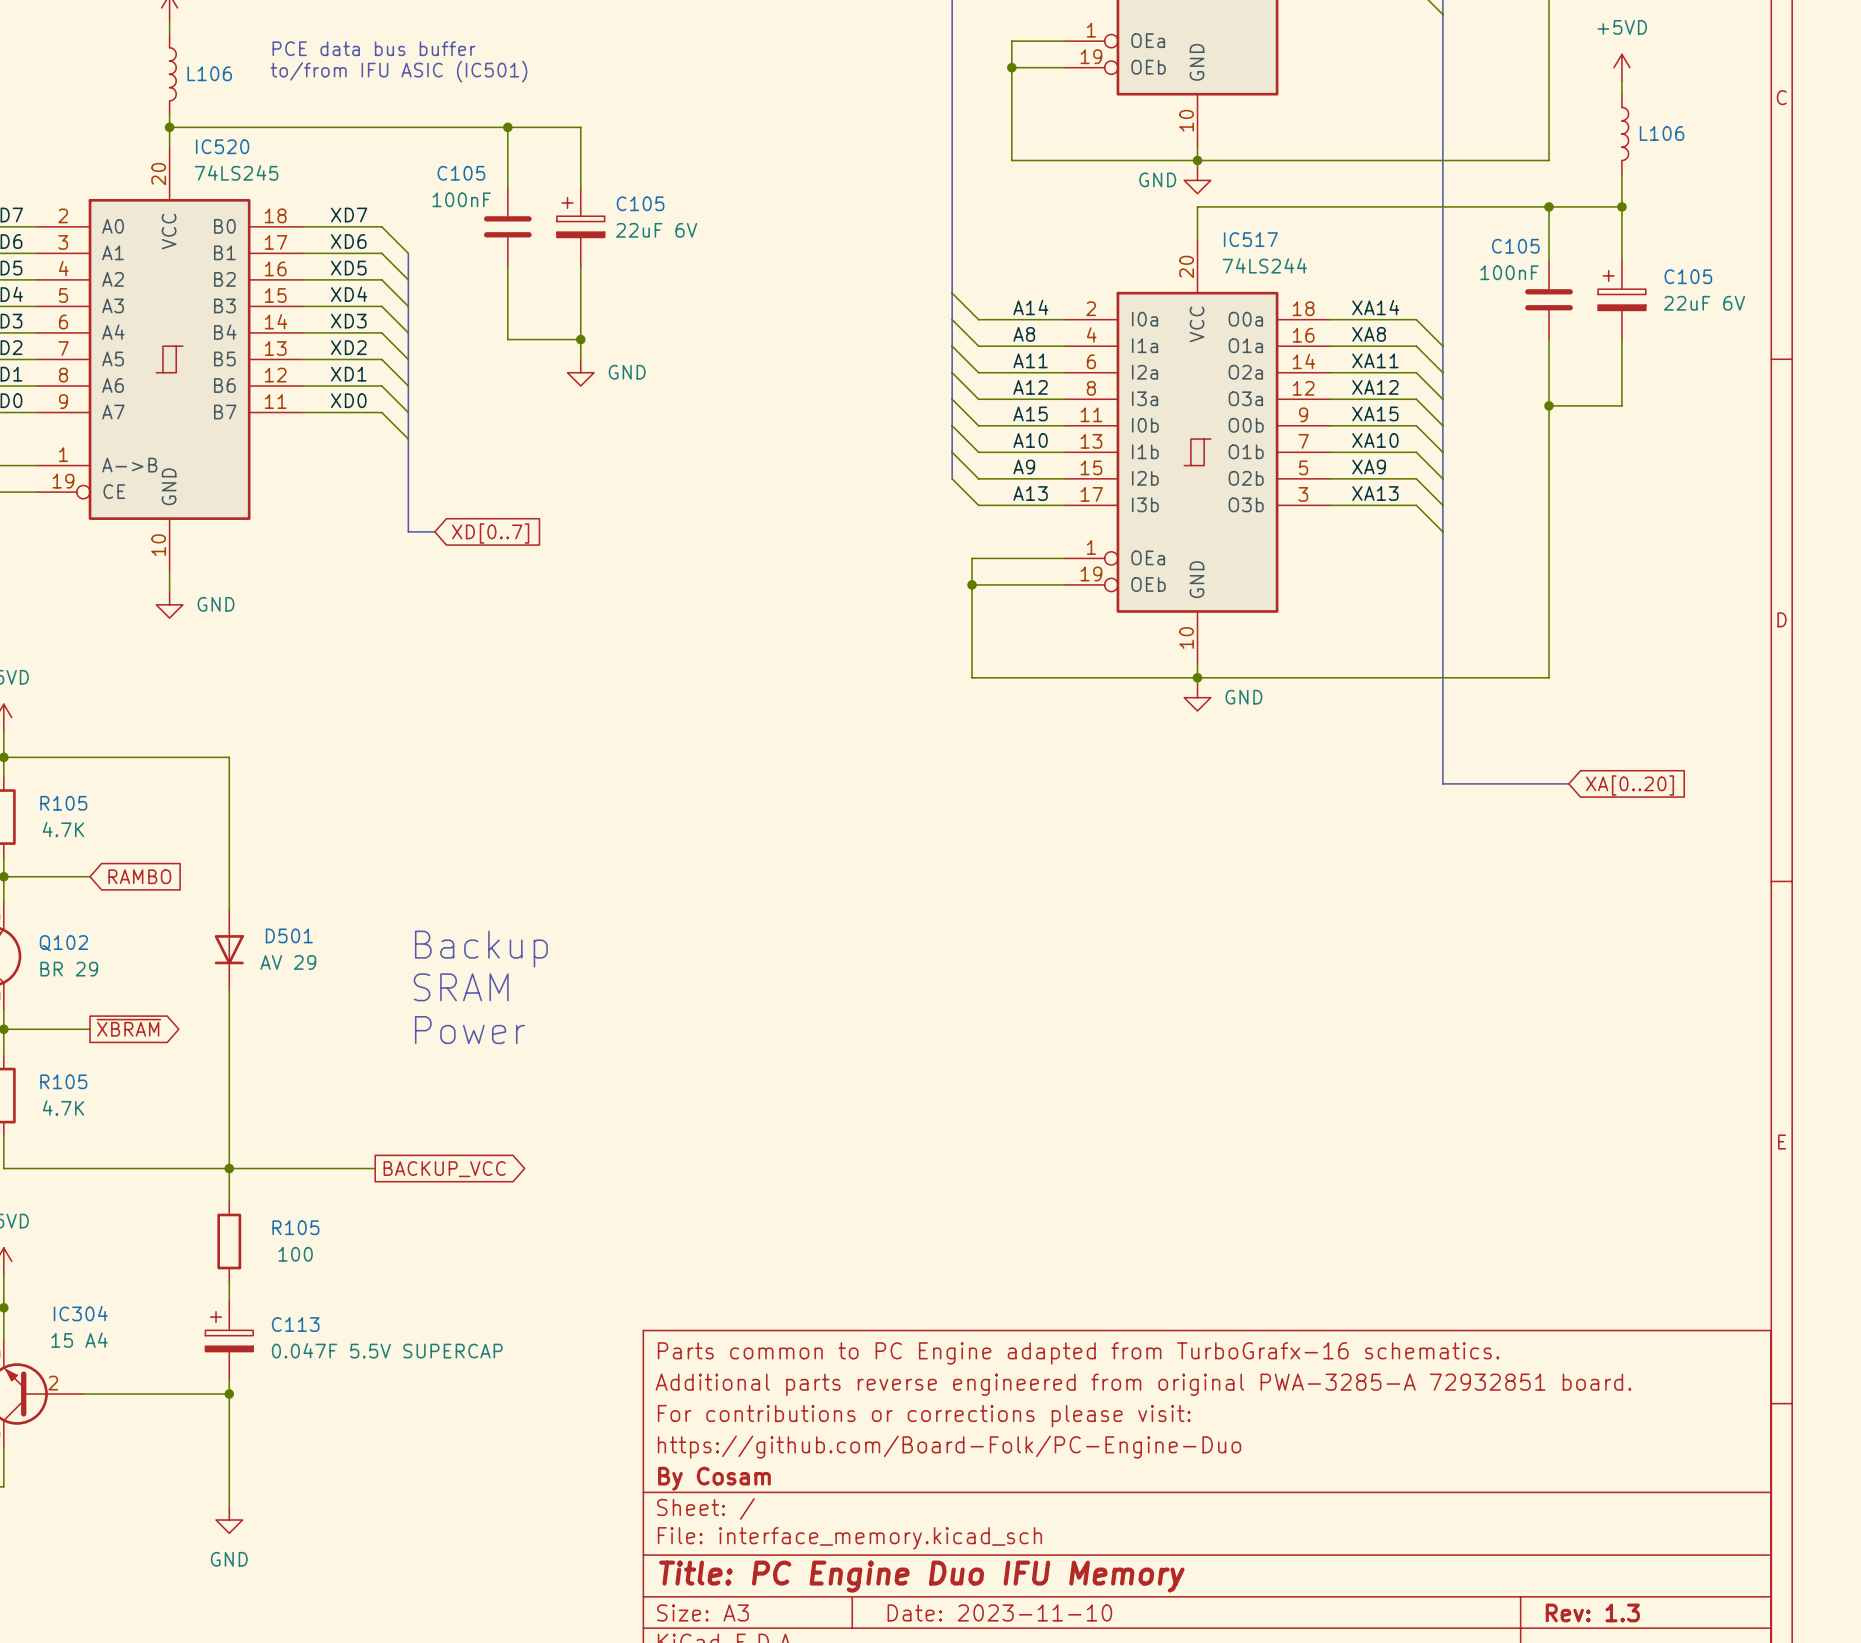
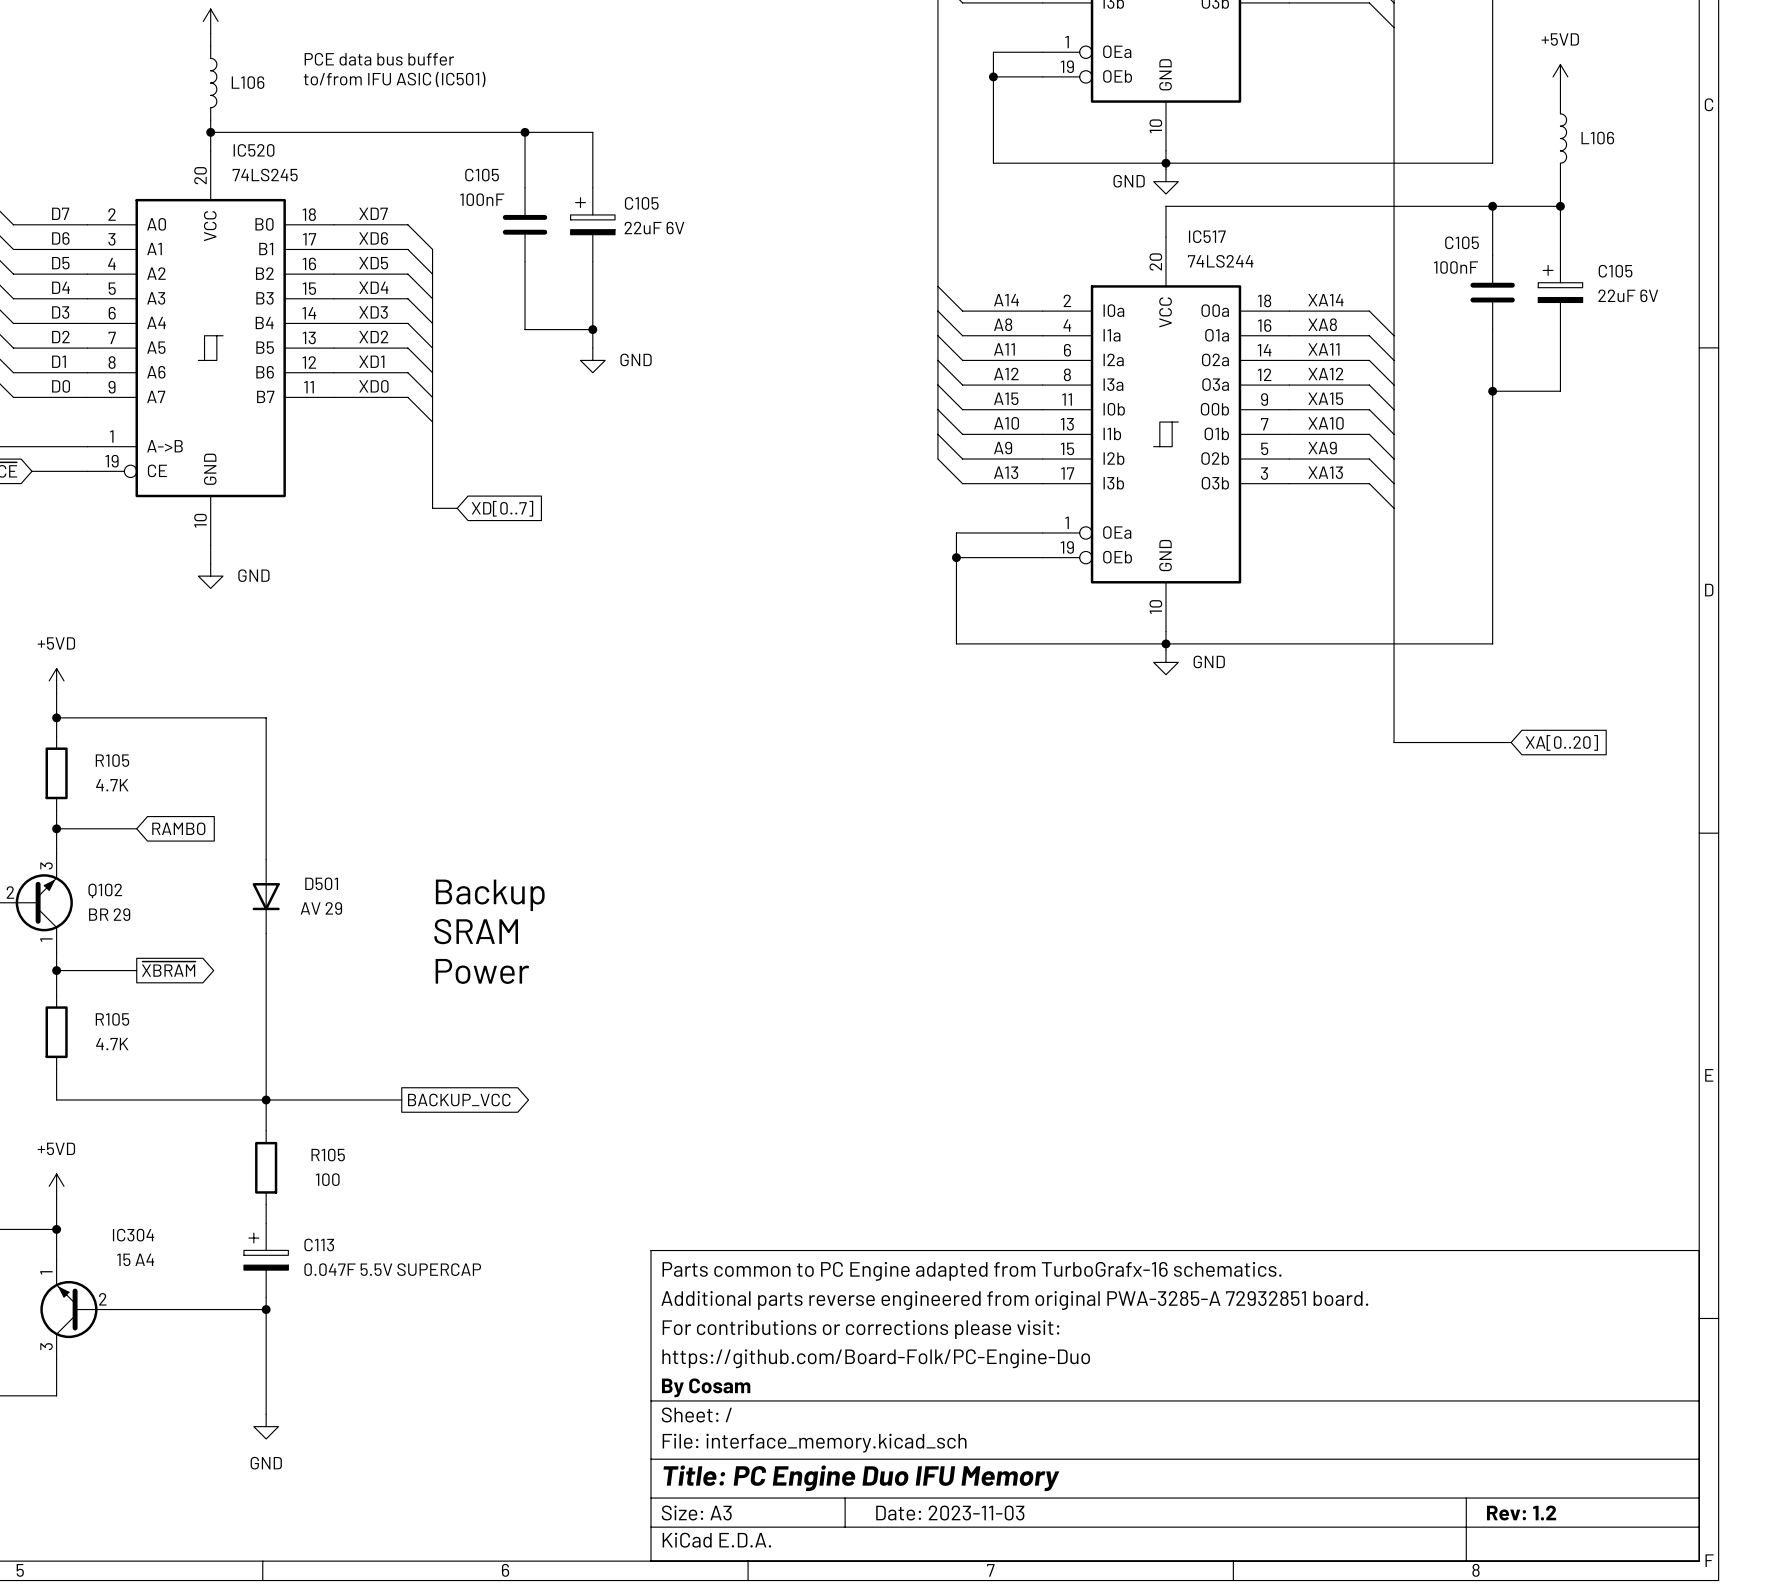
title block: Date: 2023-11-10 (999, 1612) -> Date: 2023-11-03 (950, 1513)
title block: Rev: 1.3 (1592, 1612) -> Rev: 1.2 (1521, 1513)

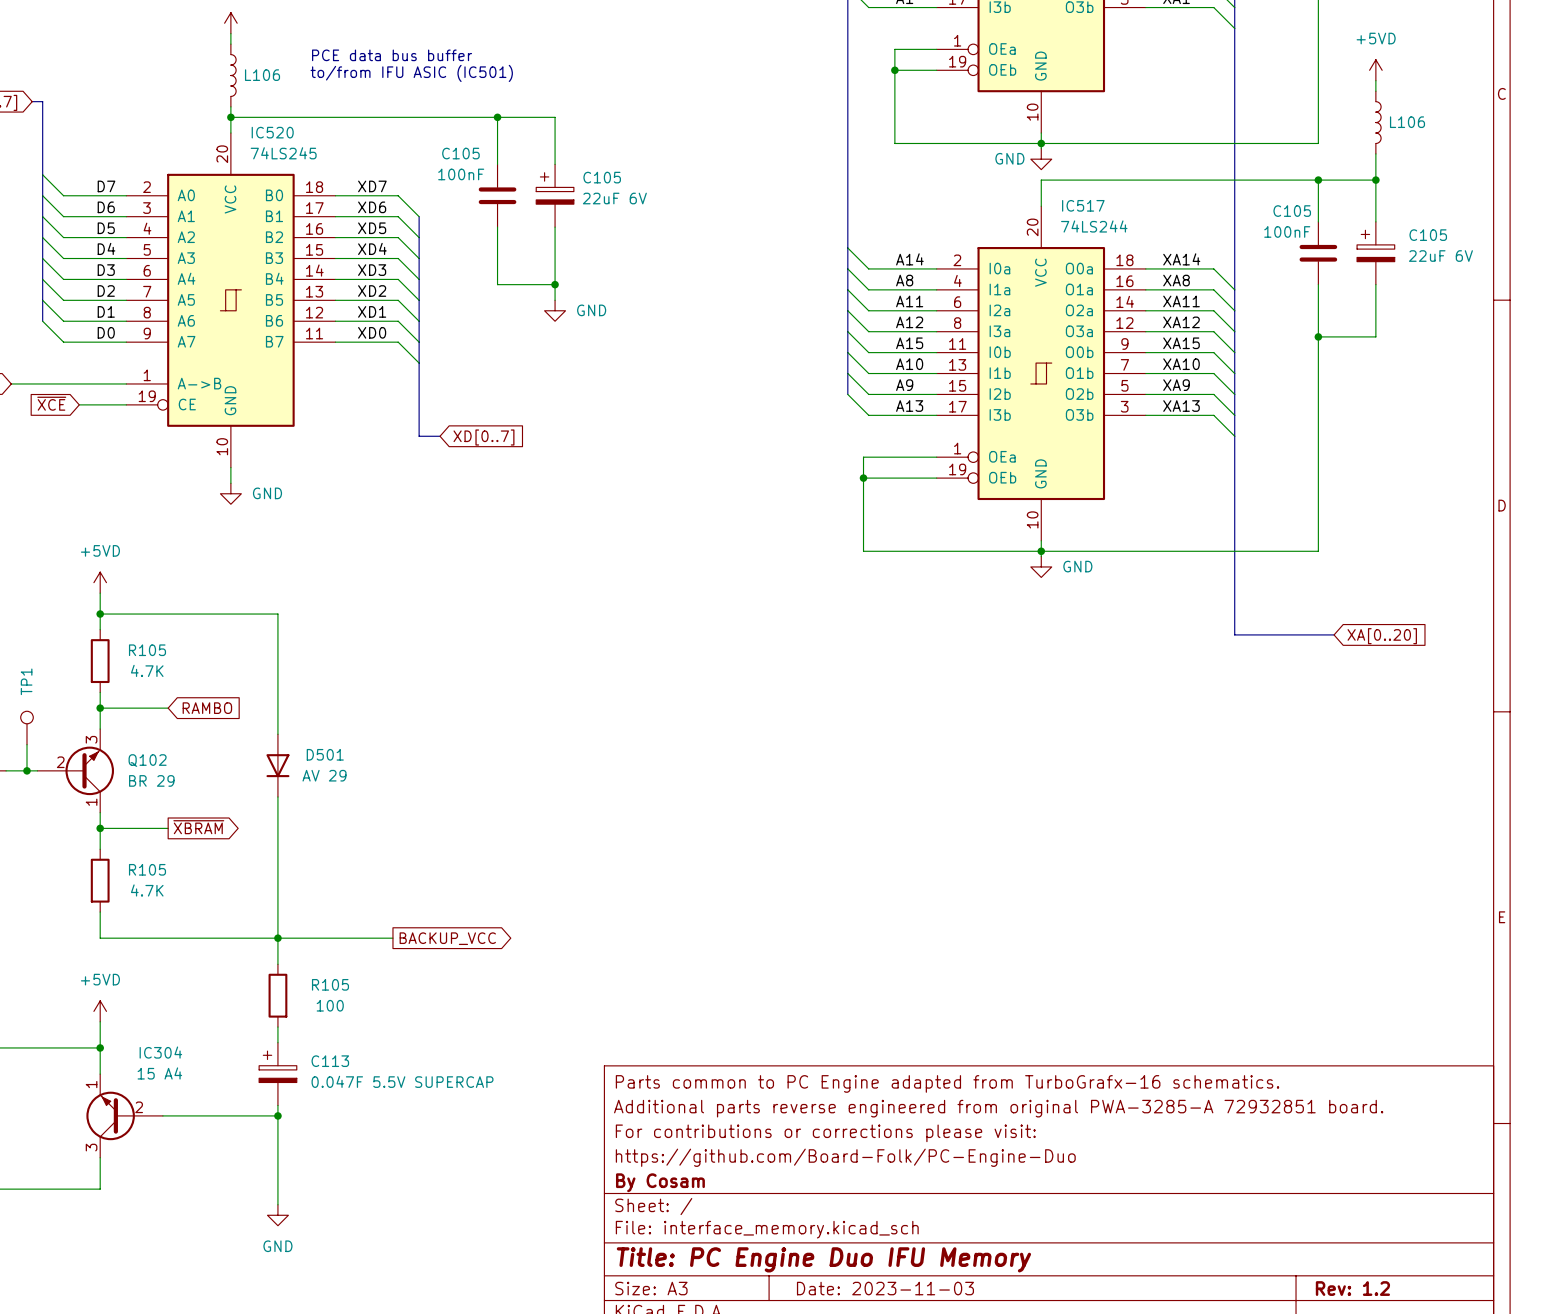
text: Backup (490, 895) -> none
text: SRAM (476, 931) -> none
text: Power (482, 971) -> none

